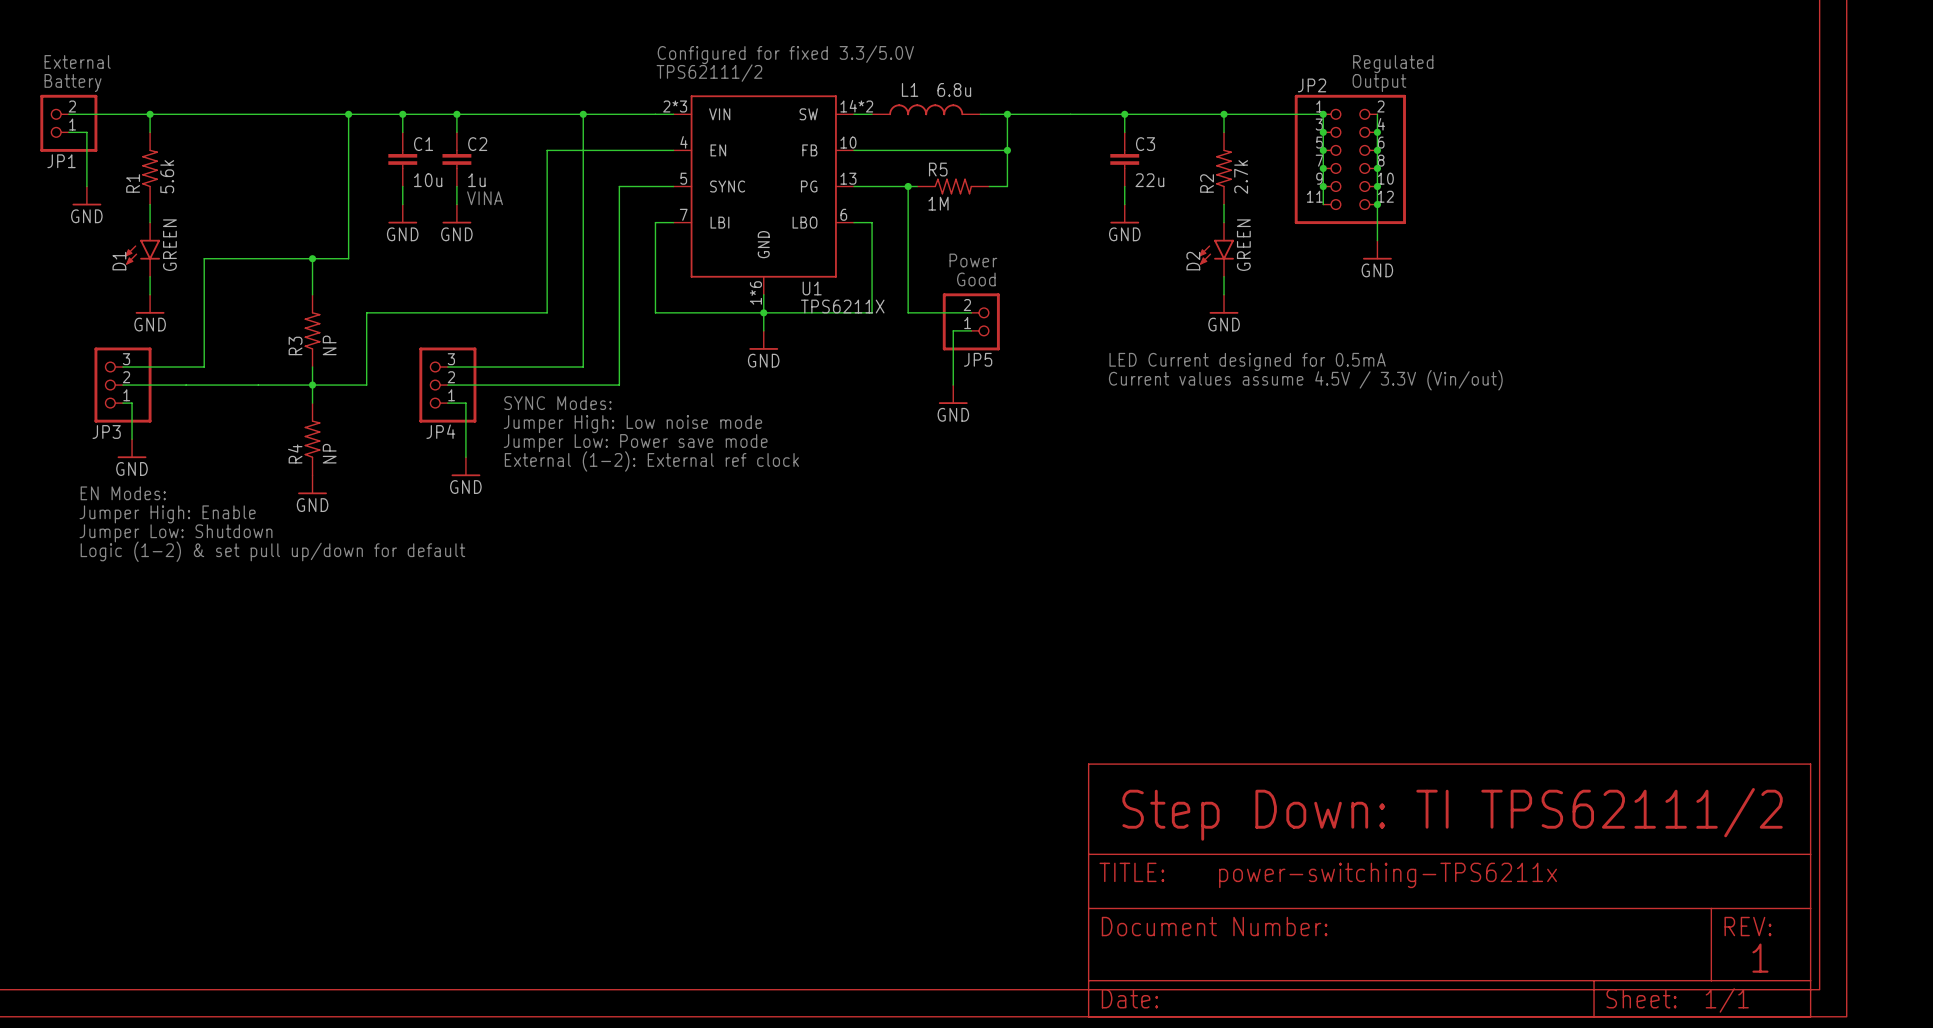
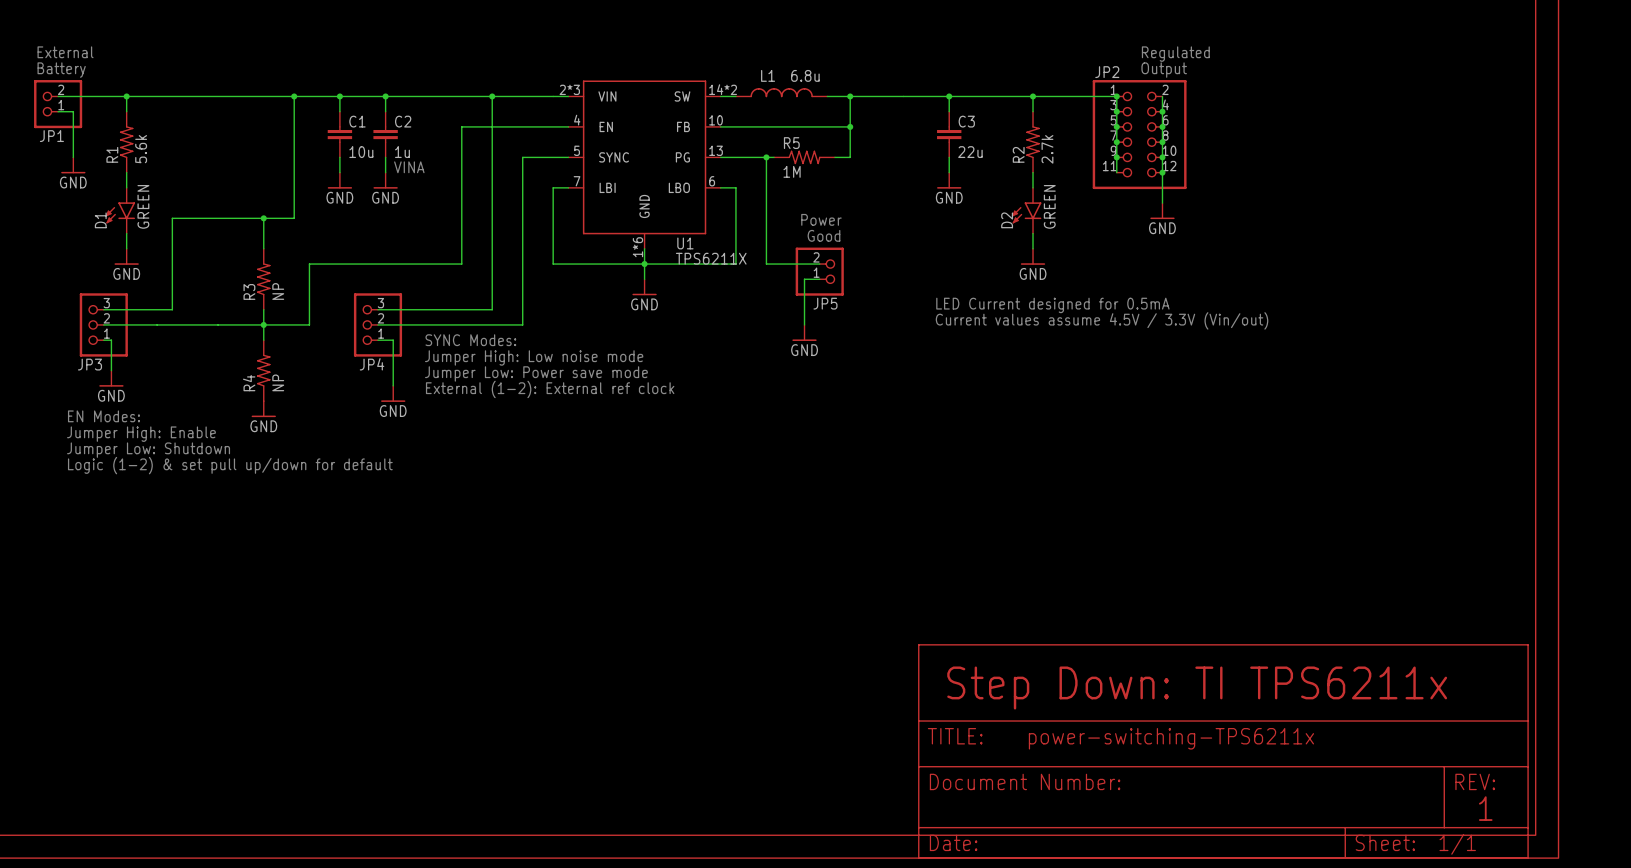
text: Configured for fixed 3.3/5.0V (785, 54) -> none
text: TPS62111/2 (709, 73) -> none
text: Step Down: TI TPS62111/2 (1452, 814) -> Step Down: TI TPS6211x (1197, 688)

